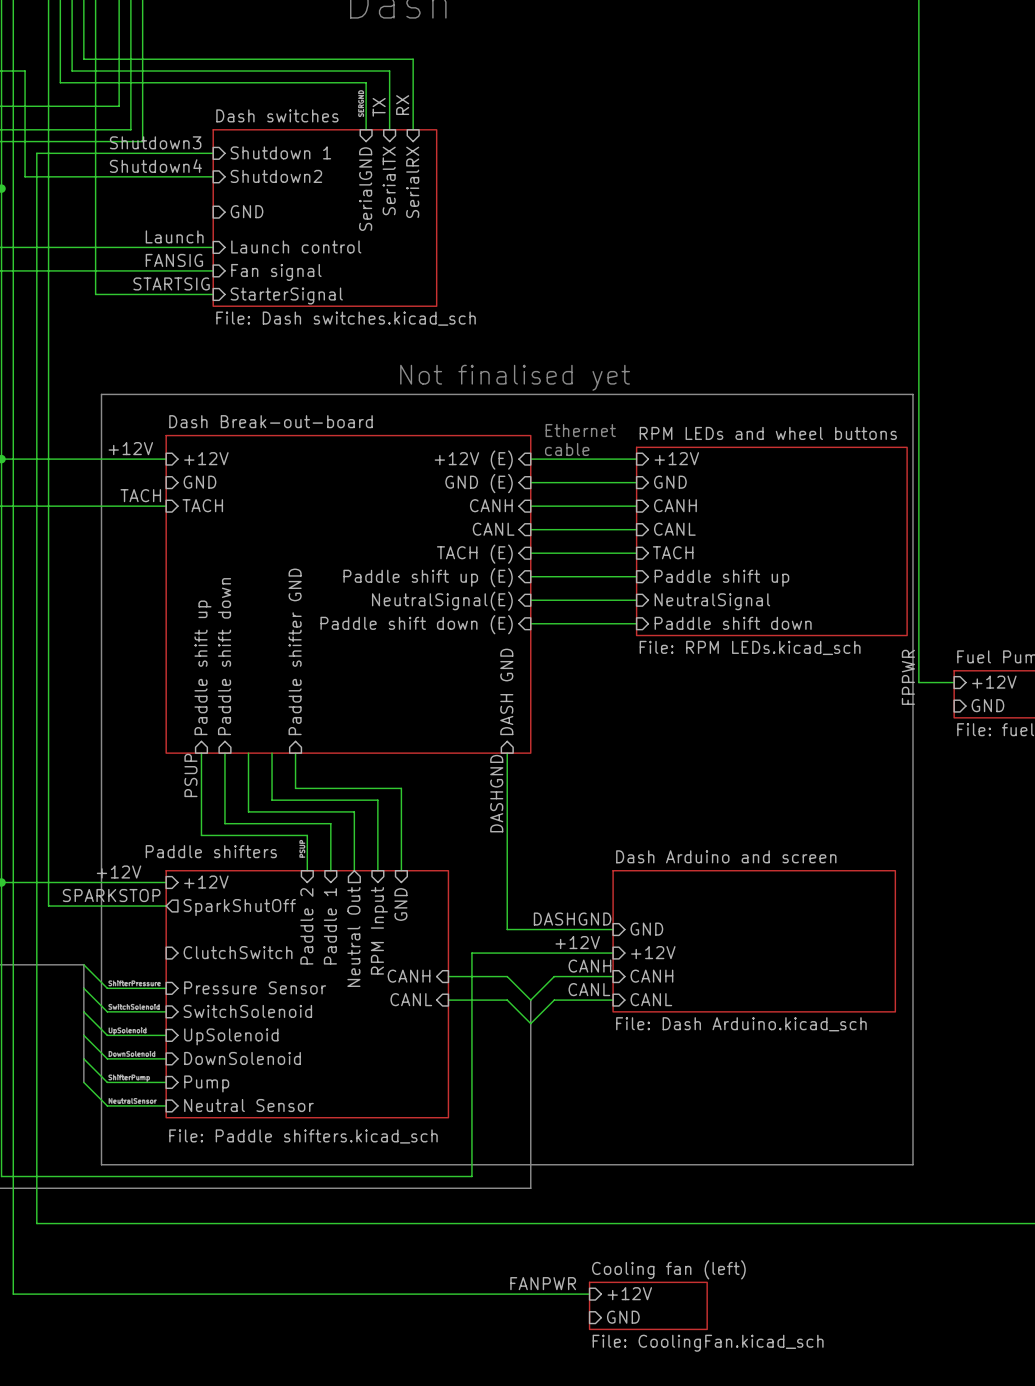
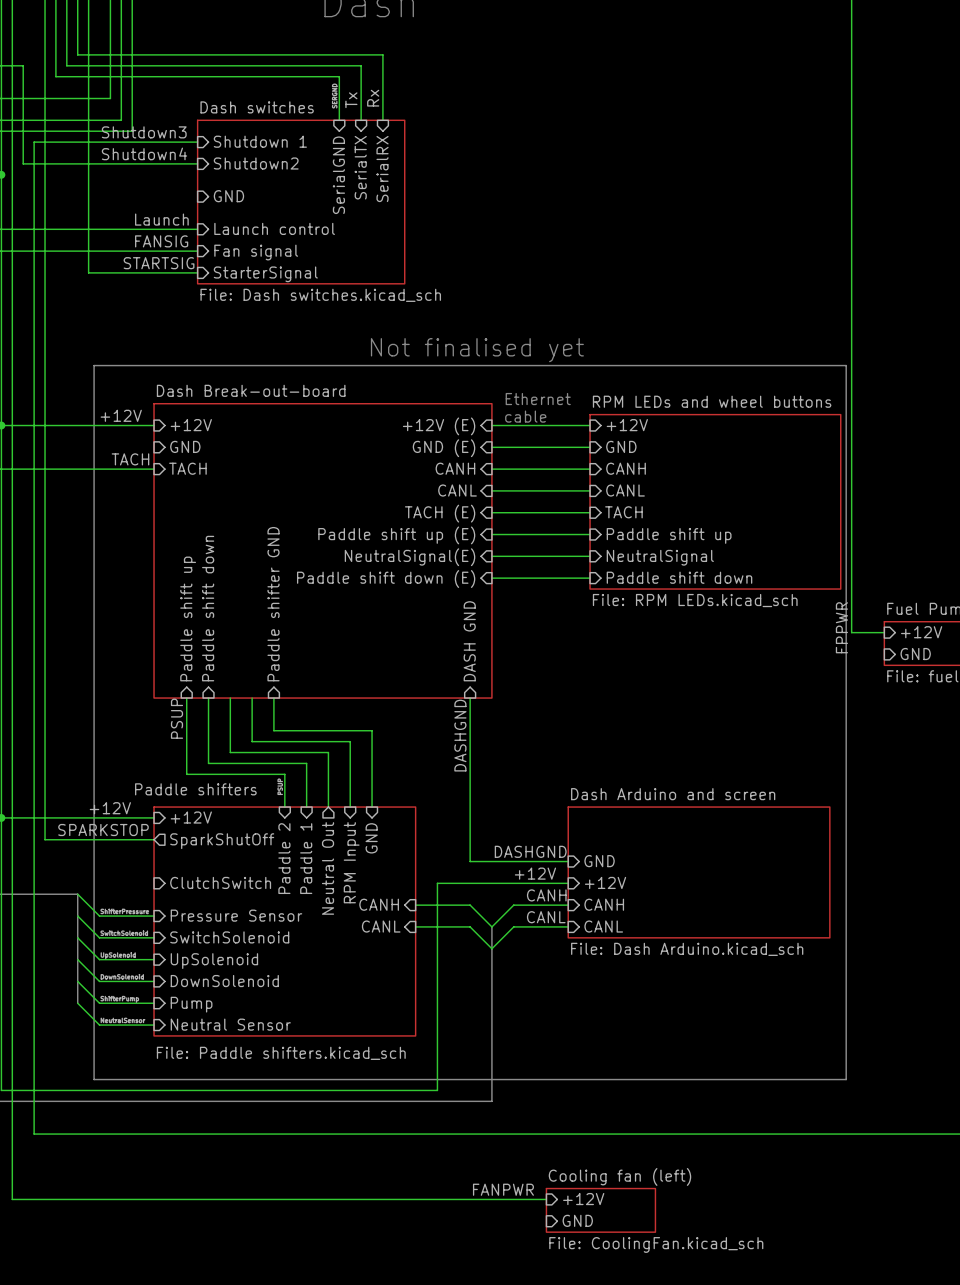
label: RX (402, 105) -> Rx (373, 98)
label: TX (379, 107) -> Tx (351, 100)

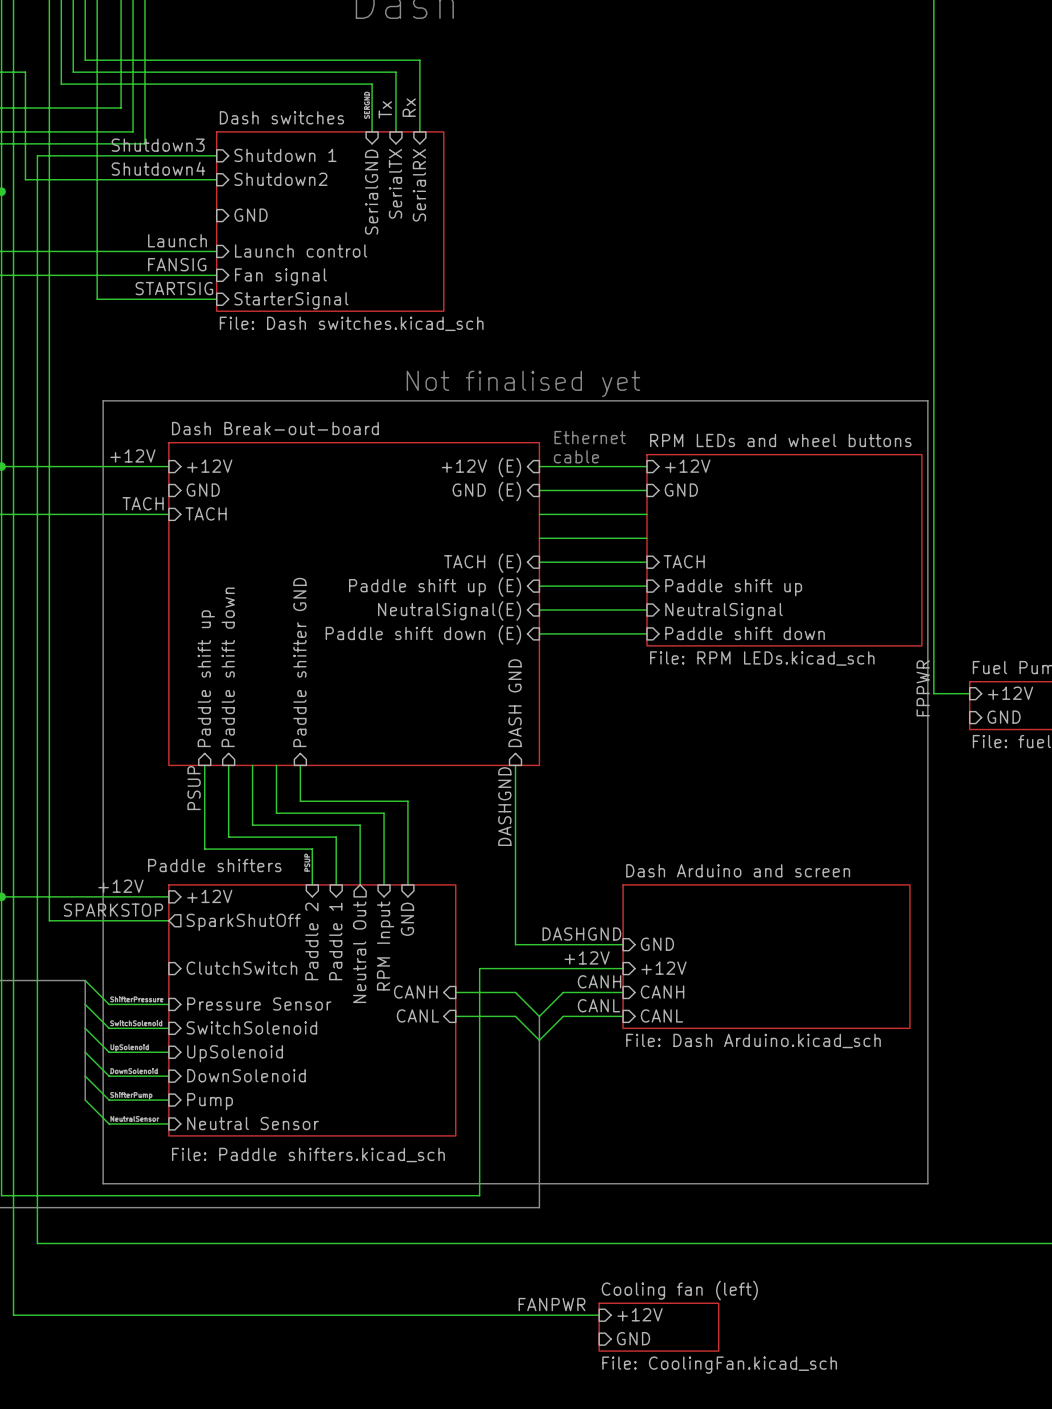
sheet pin: CANH (455, 468) -> none
sheet pin: CANH (626, 468) -> none
sheet pin: CANL (457, 490) -> none
sheet pin: CANL (625, 490) -> none

